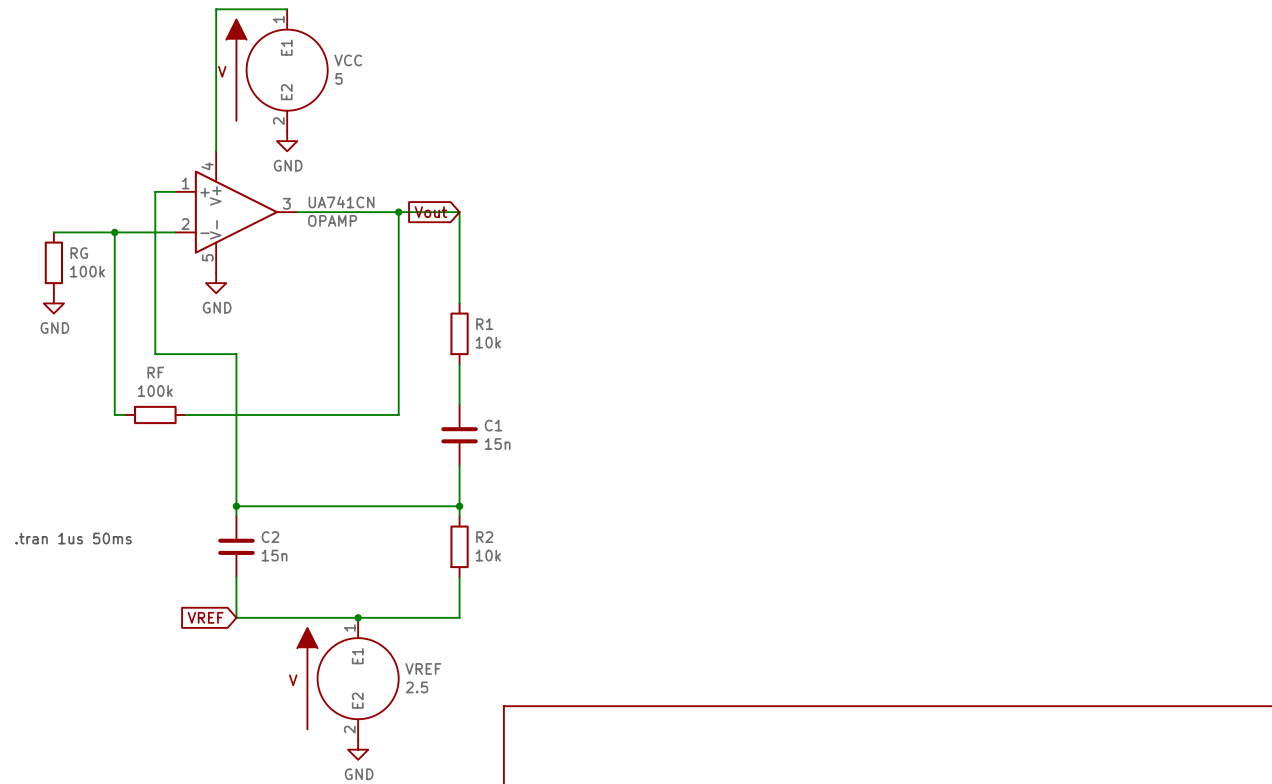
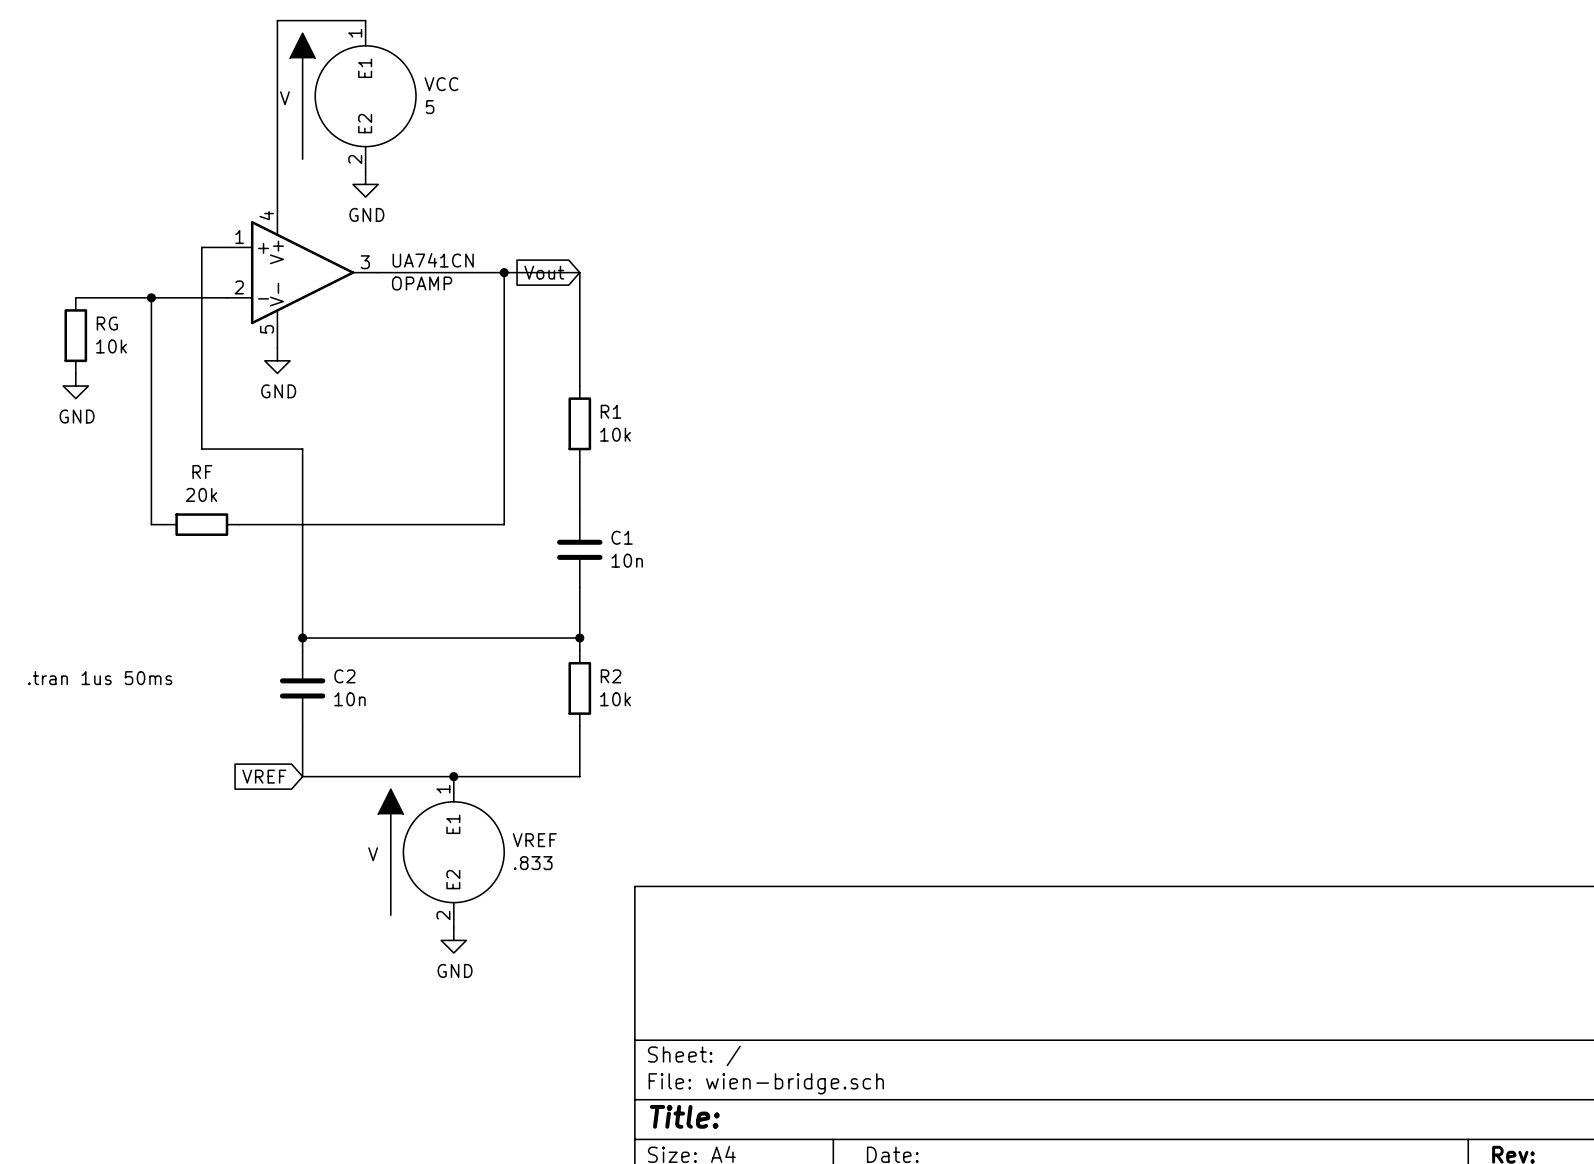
RG value: 100k (87, 271) -> 10k (111, 346)
RF value: 100k (155, 391) -> 20k (201, 494)
C1 value: 15n (497, 444) -> 10n (627, 560)
C2 value: 15n (274, 555) -> 10n (349, 699)
VREF value: 2.5 (417, 687) -> .833 (533, 863)

